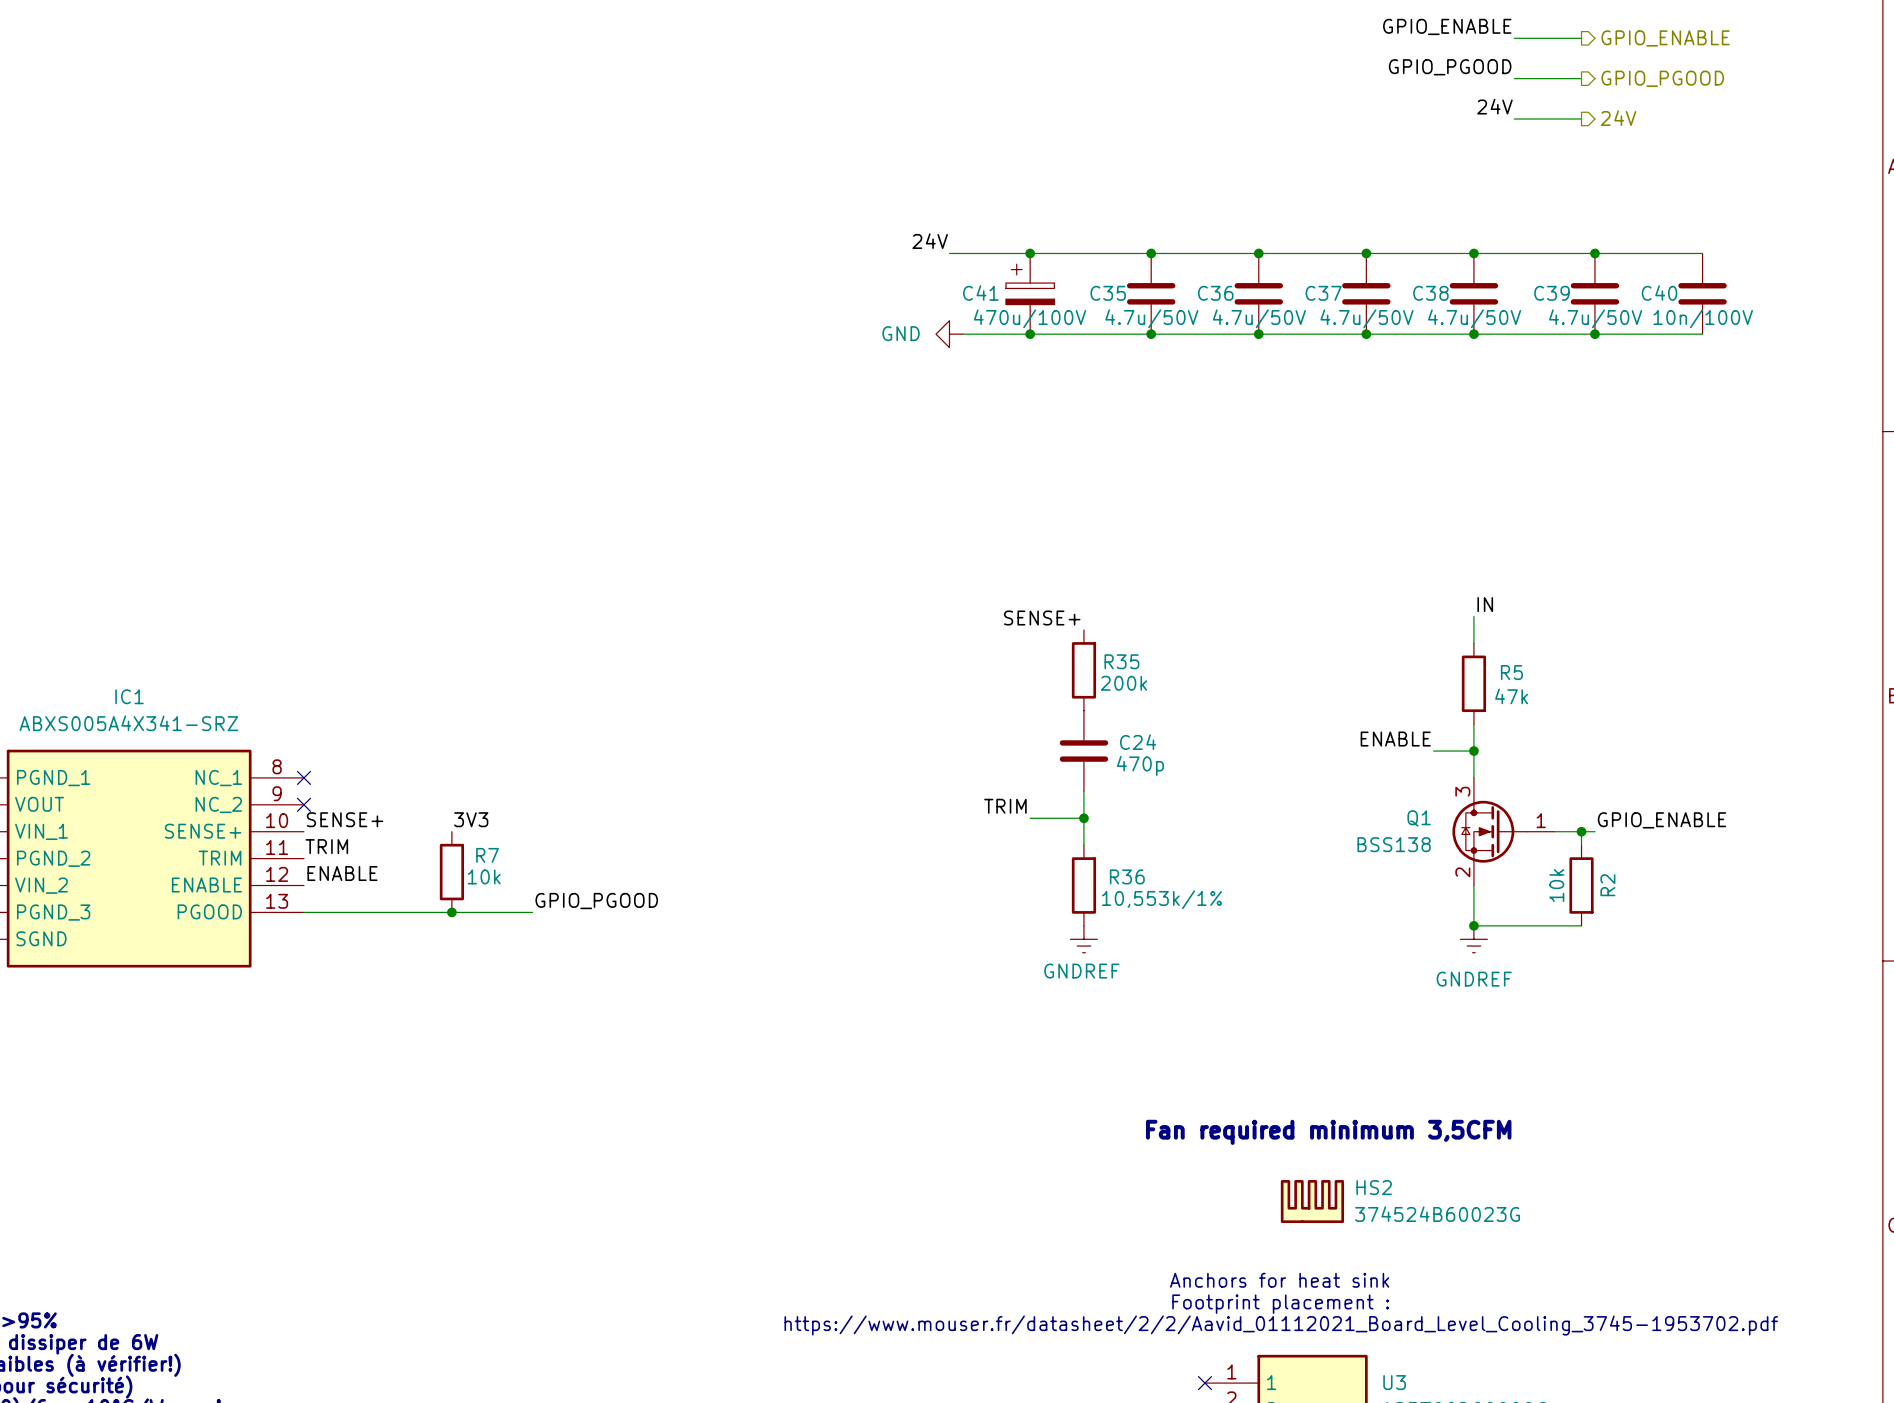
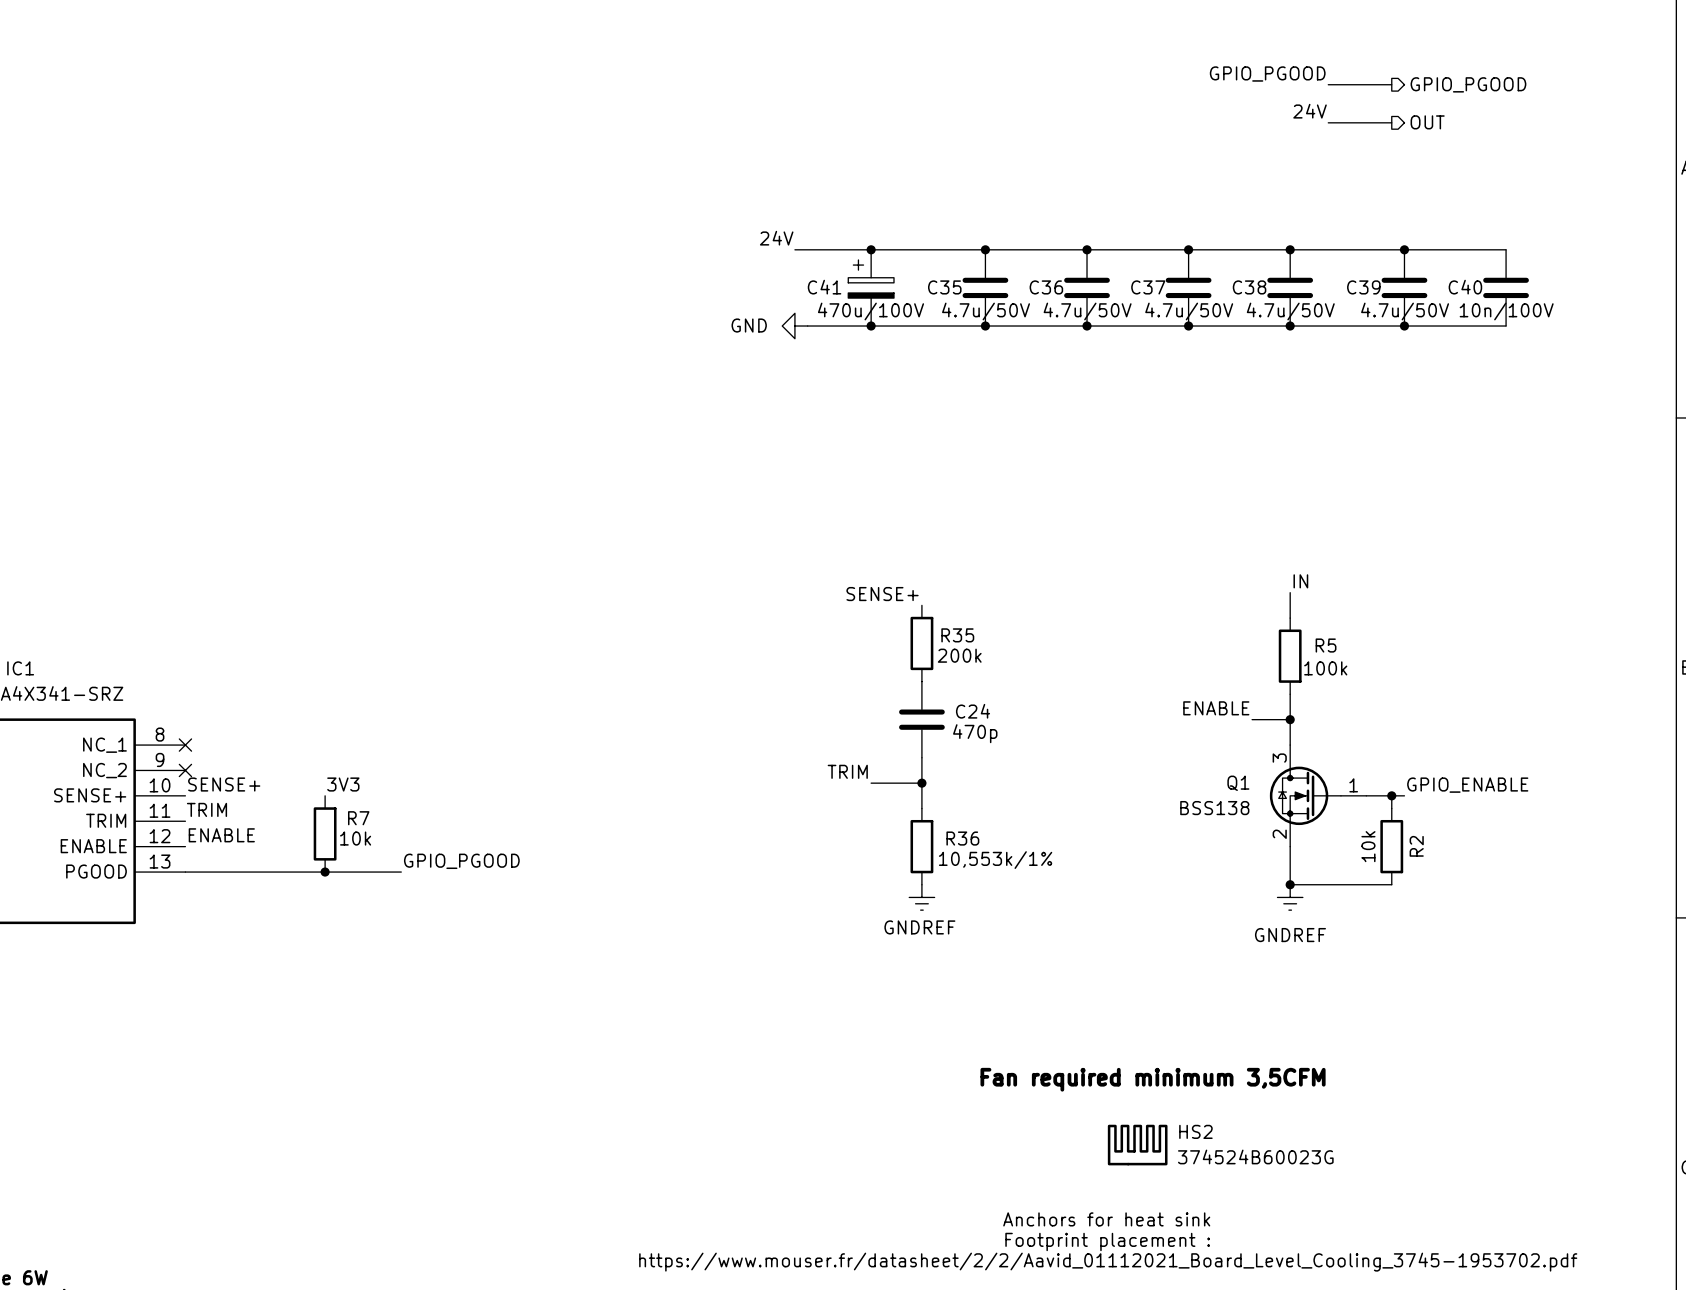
label: GPIO_ENABLE (1447, 26) -> none
wire: (1514, 38) (1581, 38) -> none
hierarchical label: GPIO_ENABLE (1665, 38) -> none
hierarchical label: 24V (1618, 118) -> OUT (1427, 122)
R5 value: 47k (1511, 696) -> 100k (1325, 668)

